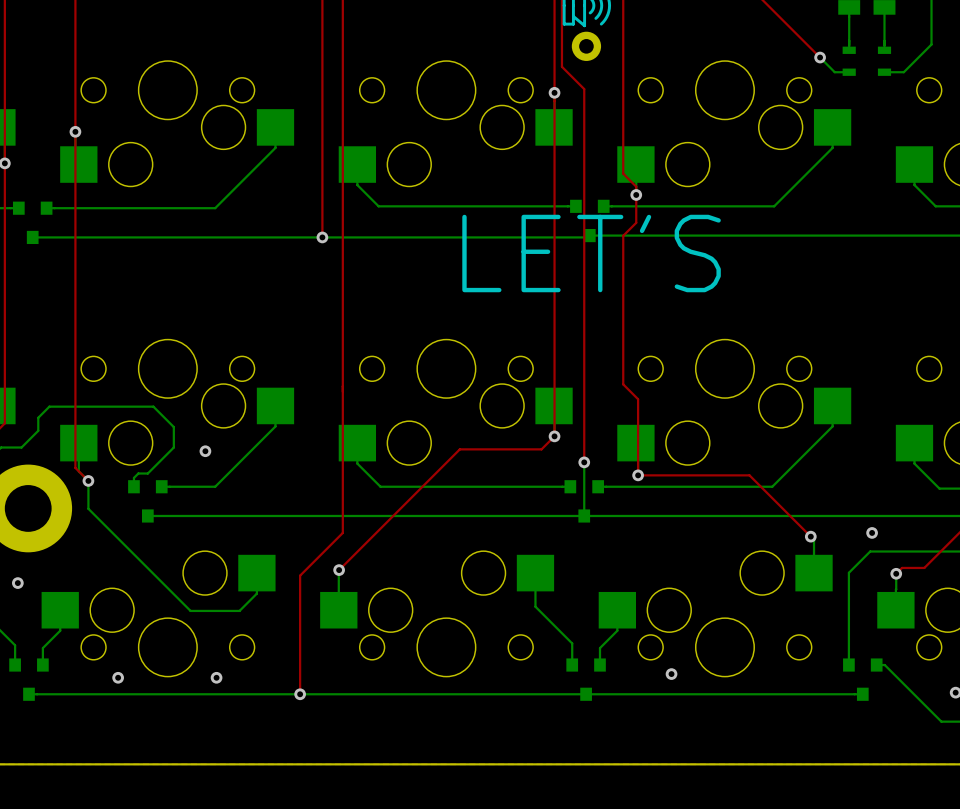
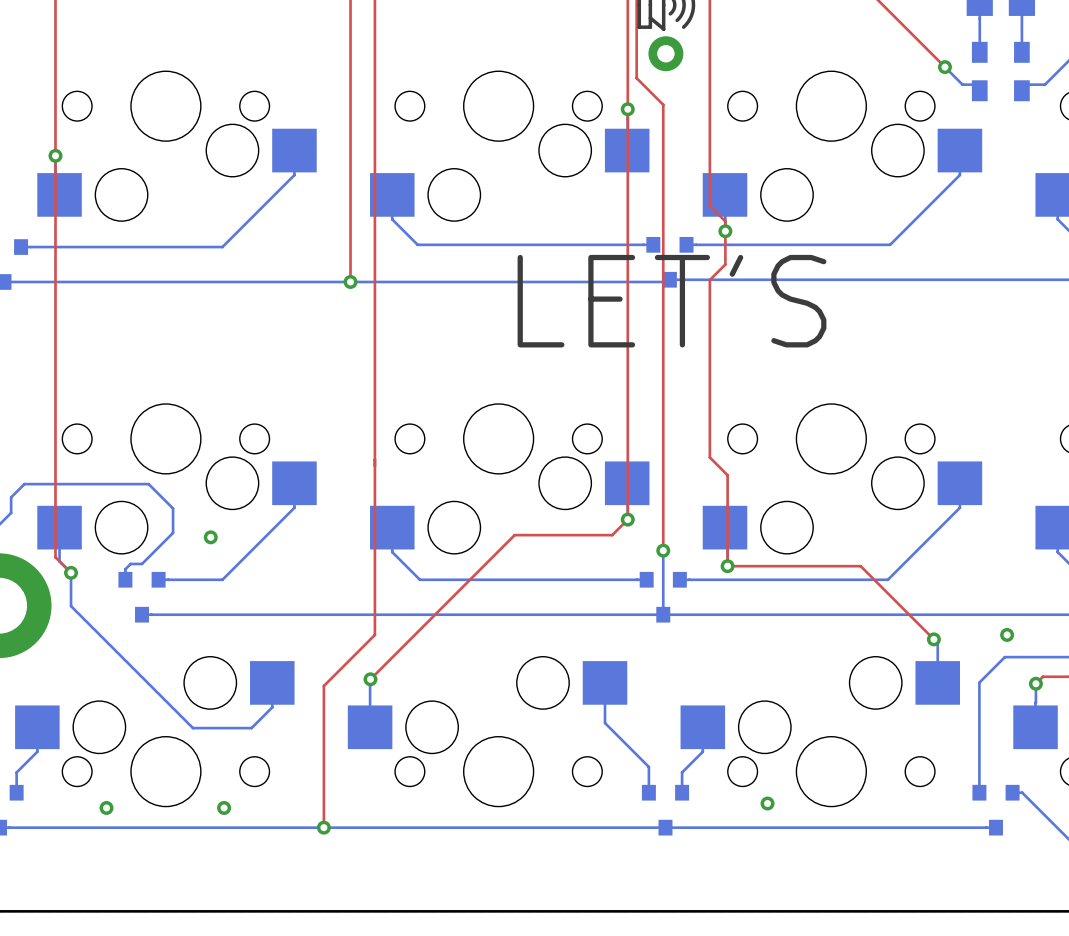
part footprint: [842, 46, 856, 76] -> [971, 41, 988, 102]
part footprint: [877, 46, 892, 76] -> [1014, 41, 1030, 102]

